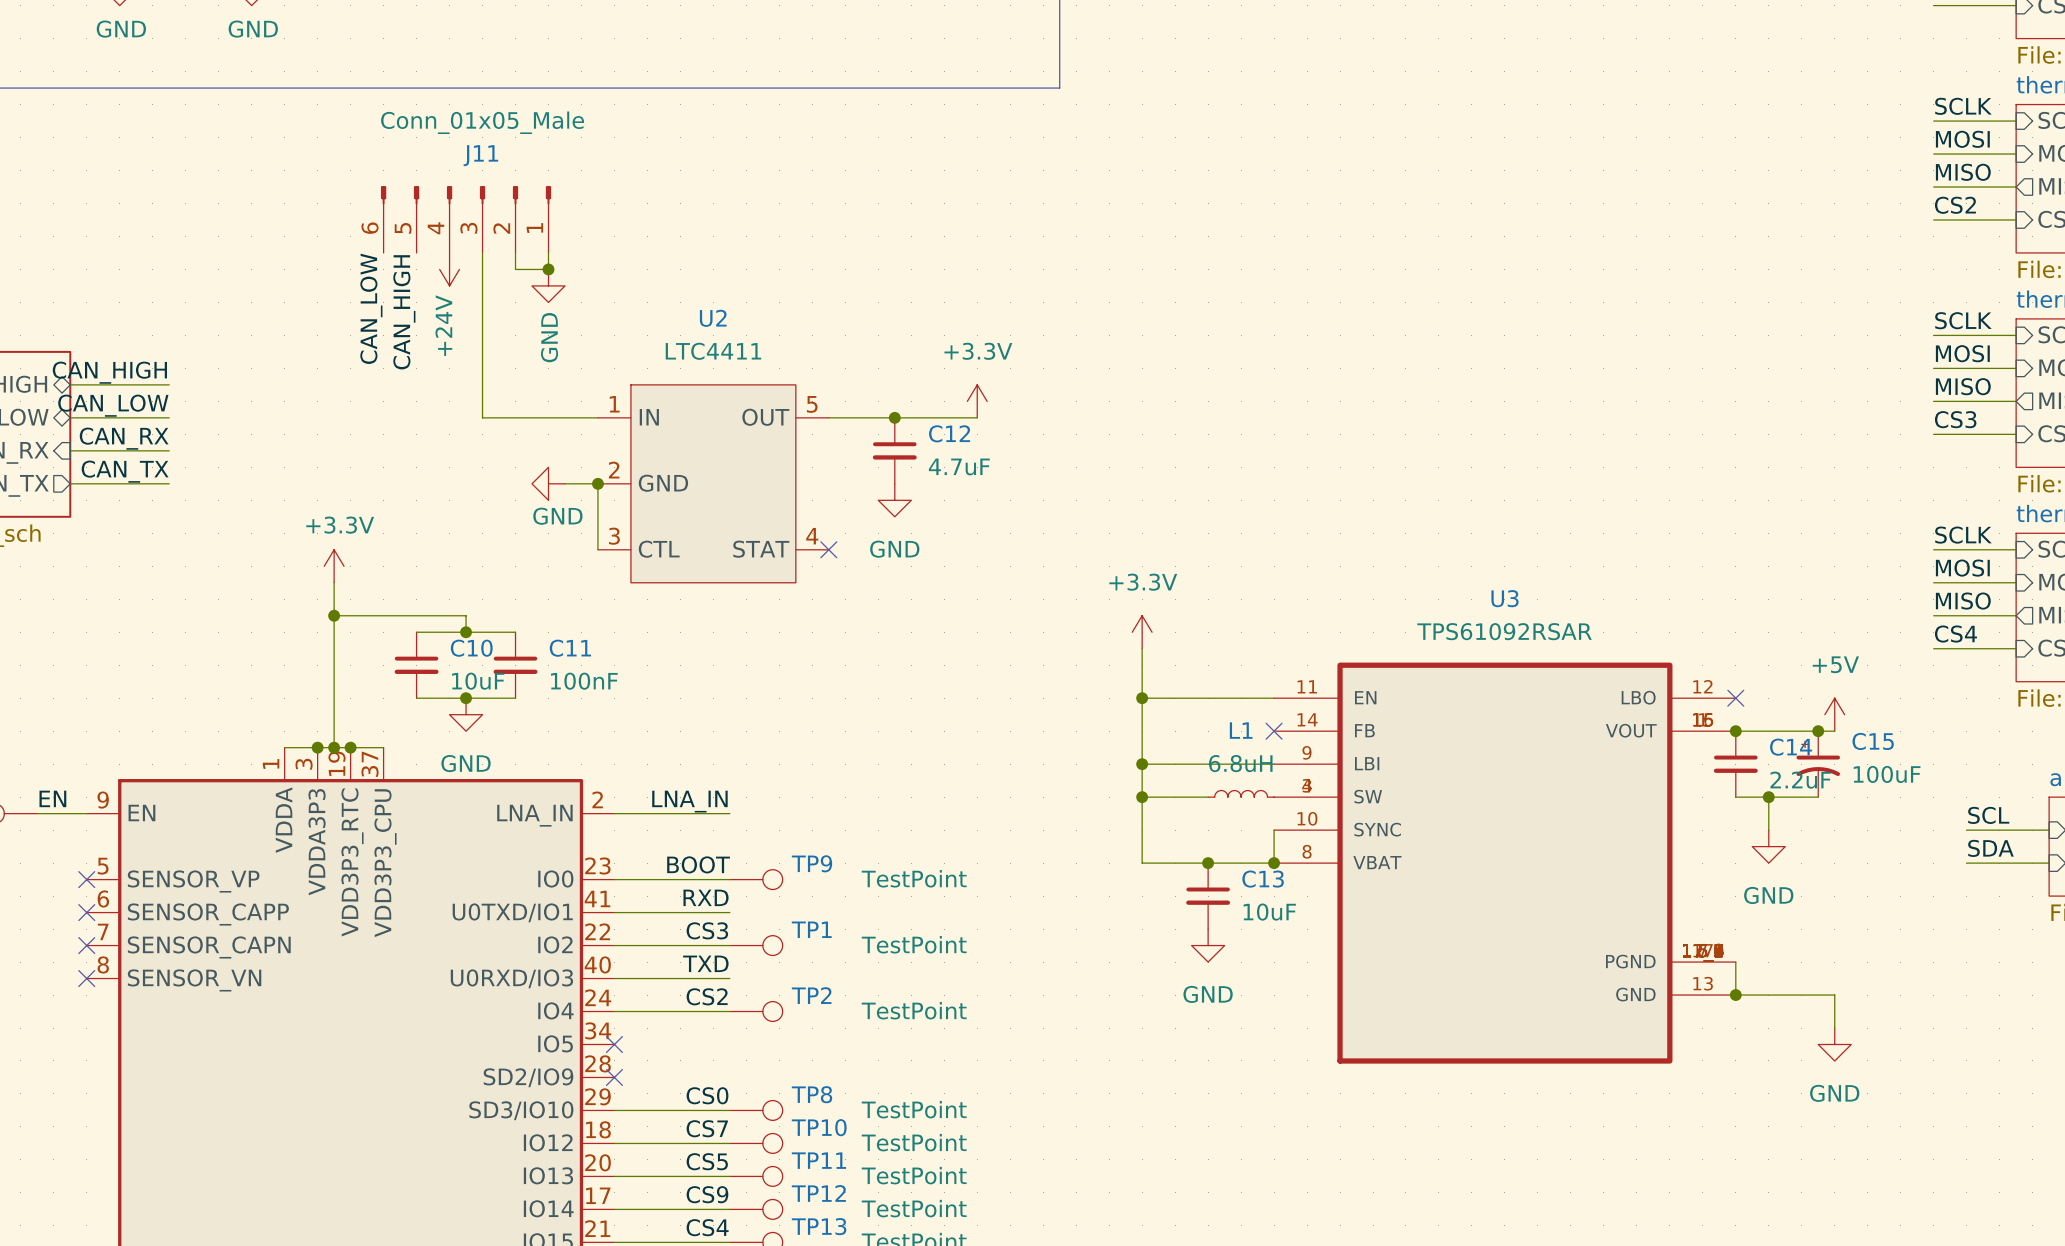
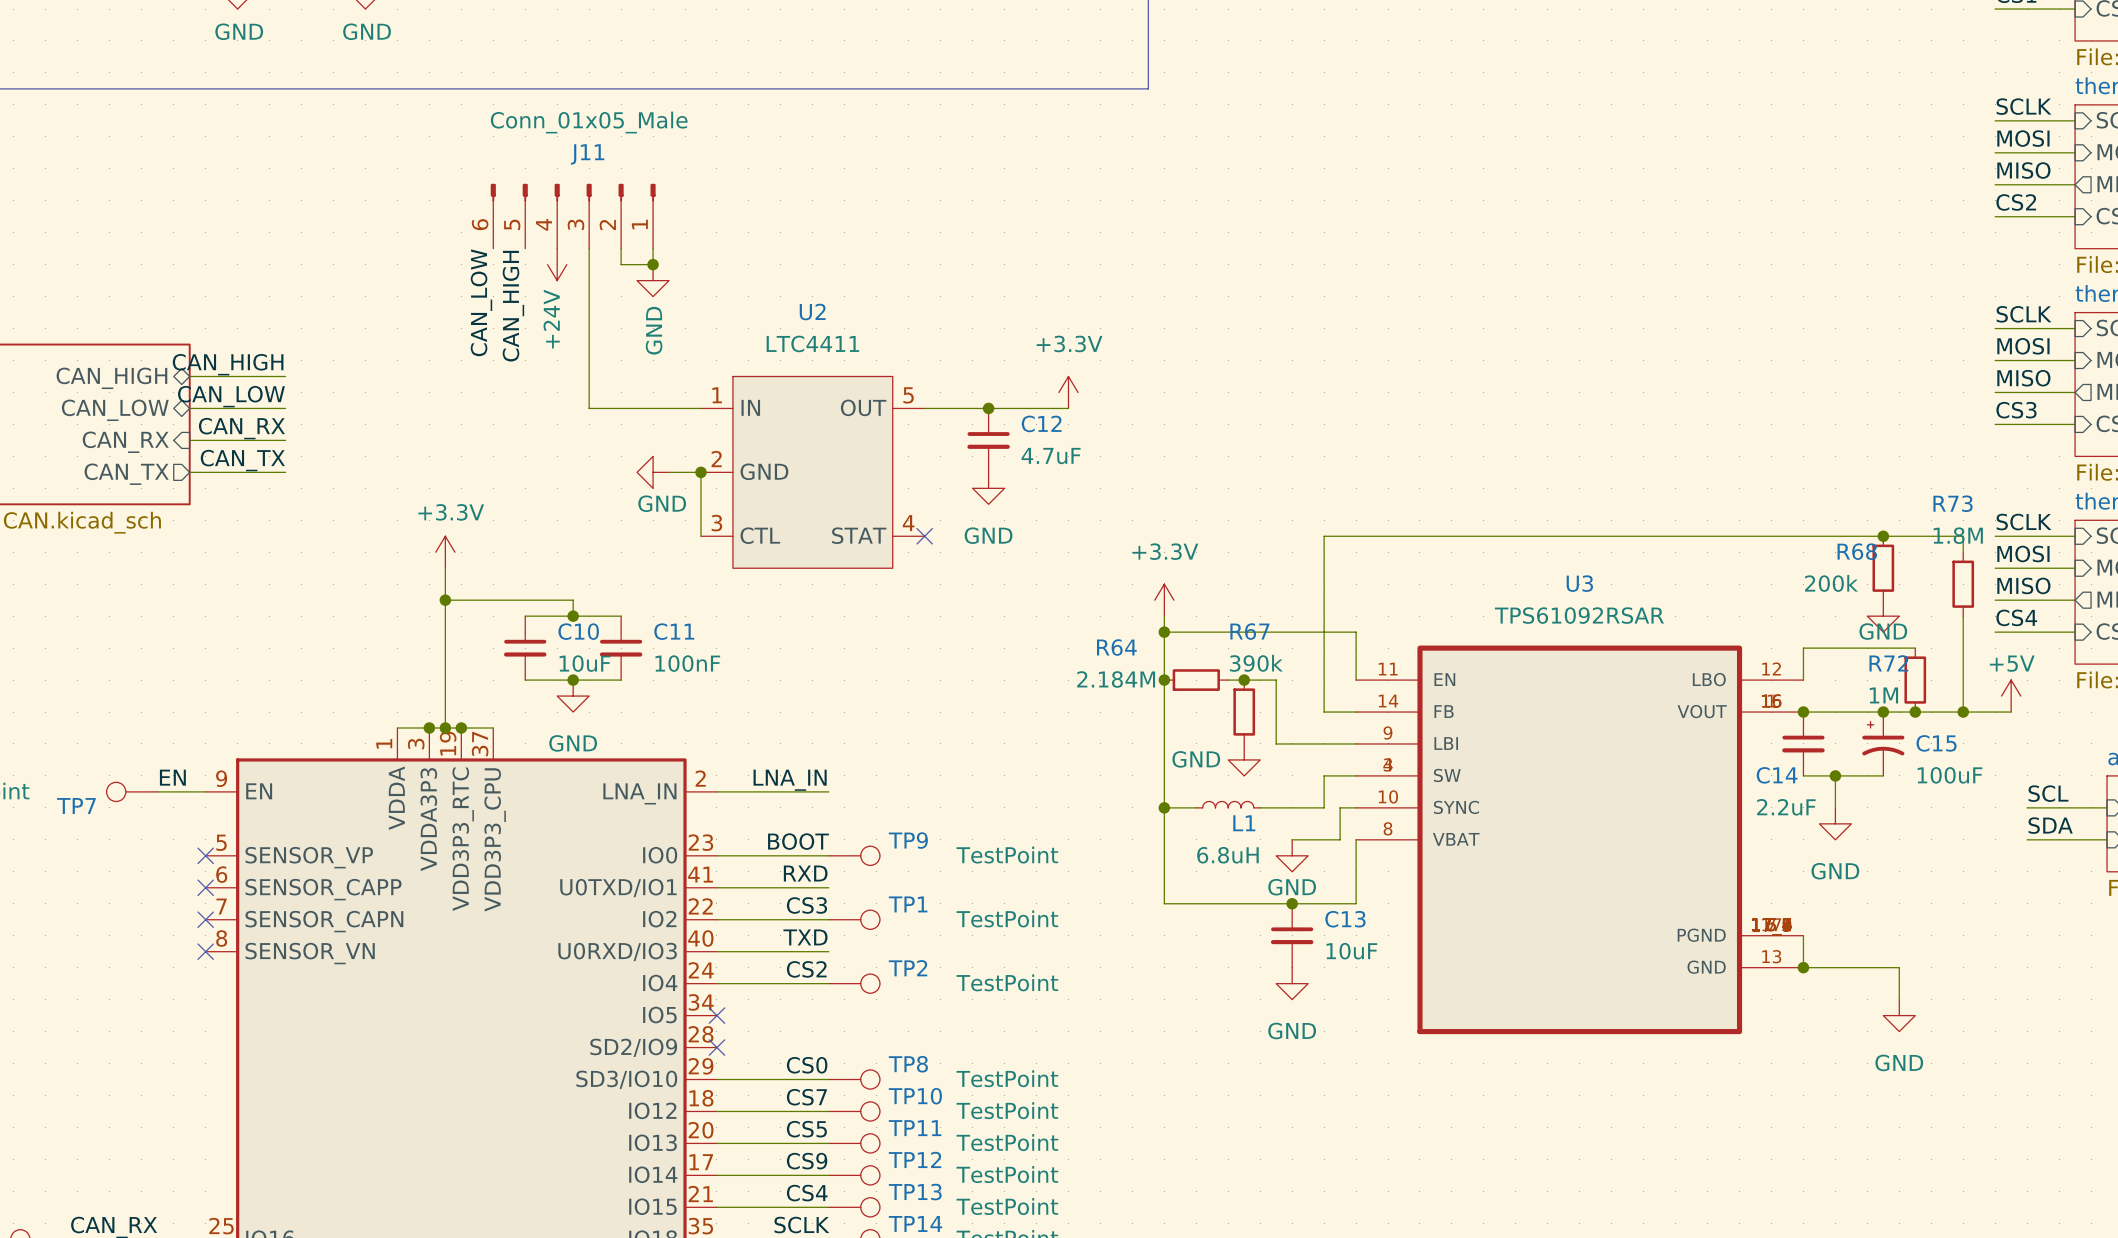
junction: none -> (1883, 536)
wire: none -> (1963, 552) (1963, 536) (1324, 536) (1324, 712) (1356, 712)
R68: none -> 200k (1883, 568)
R73: none -> 1.8M (1963, 584)
wire: none -> (1164, 616) (1164, 903) (1356, 903) (1356, 839)
power symbol position: +3.3V (1142, 632) -> +3.3V (1164, 600)
power symbol: none -> GND (1883, 616)
wire: none -> (1963, 616) (1963, 712)
junction: none -> (1164, 632)
wire: (1142, 648) (1142, 863) (1208, 863) -> none
power symbol text position: +5V (1835, 664) -> +5V (2012, 663)
wire: none -> (1915, 648) (1803, 648) (1803, 680)
junction: none -> (1164, 680)
R64: none -> 2.184M (1196, 680)
junction position: (1142, 698) -> (1244, 680)
wire: (1191, 698) (1274, 698) -> (1164, 632) (1356, 632) (1356, 680)
no-connect mark: (1735, 698) -> none
R72: none -> 1M (1915, 680)
power symbol position: +5V (1834, 714) -> +5V (2011, 696)
L1 name position: L1 (1241, 730) -> L1 (1244, 823)
R67: none -> 390k (1244, 712)
no-connect mark: (1274, 731) -> none
wire: none -> (1899, 712) (2011, 712)
junction: none -> (1915, 712)
junction: none -> (1963, 712)
C15 name position: C15 (1873, 741) -> C15 (1936, 743)
C14 name position: C14 (1791, 747) -> C14 (1777, 775)
L1 value position: 6.8uH (1240, 763) -> 6.8uH (1227, 855)
wire: (1142, 764) (1191, 764) -> (1276, 680) (1276, 743)
junction: (1142, 764) -> none
C15 value position: 100uF (1887, 774) -> 100uF (1950, 775)
power symbol: none -> GND (1244, 759)
C14 value position: 2.2uF (1800, 780) -> 2.2uF (1786, 807)
L1 position: (1241, 793) -> (1228, 804)
wire: (1142, 797) (1208, 797) -> none
junction: (1142, 797) -> none
wire: none -> (1356, 775) (1324, 775) (1324, 807) (1260, 807)
wire: none -> (1164, 807) (1196, 807)
junction: none -> (1164, 807)
wire: (1274, 830) (1274, 863) (1257, 863) -> (1356, 807) (1340, 807) (1340, 839)
junction: (1208, 863) -> none
junction: (1274, 863) -> none
power symbol: none -> GND (1292, 855)
C13 position: (1208, 896) -> (1292, 935)
junction: none -> (1292, 903)
power symbol: GND (1208, 945) -> none
power symbol: none -> GND (1292, 983)

